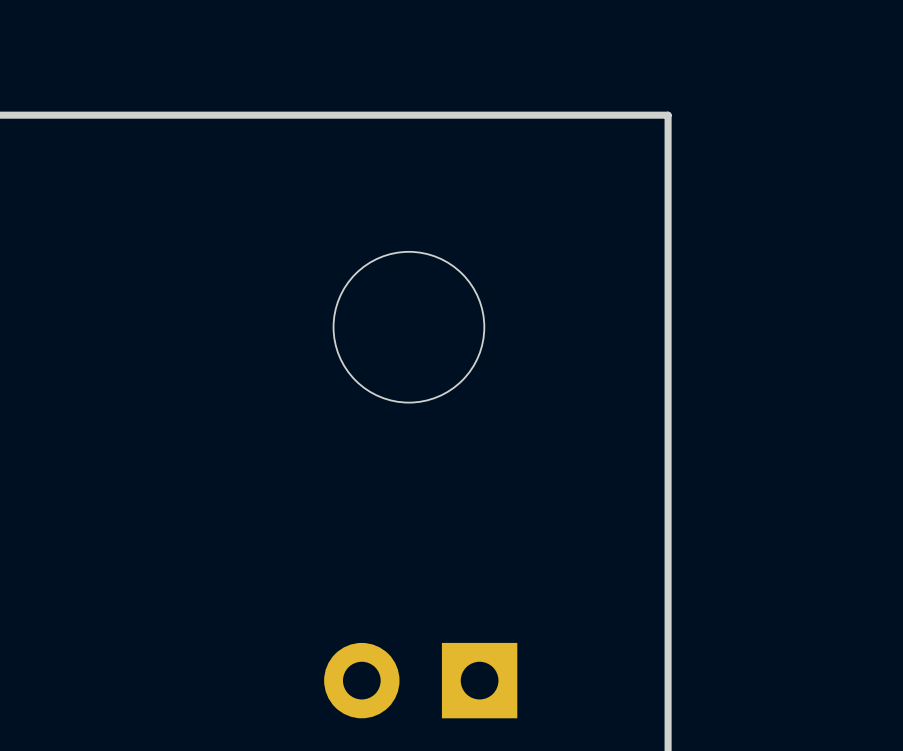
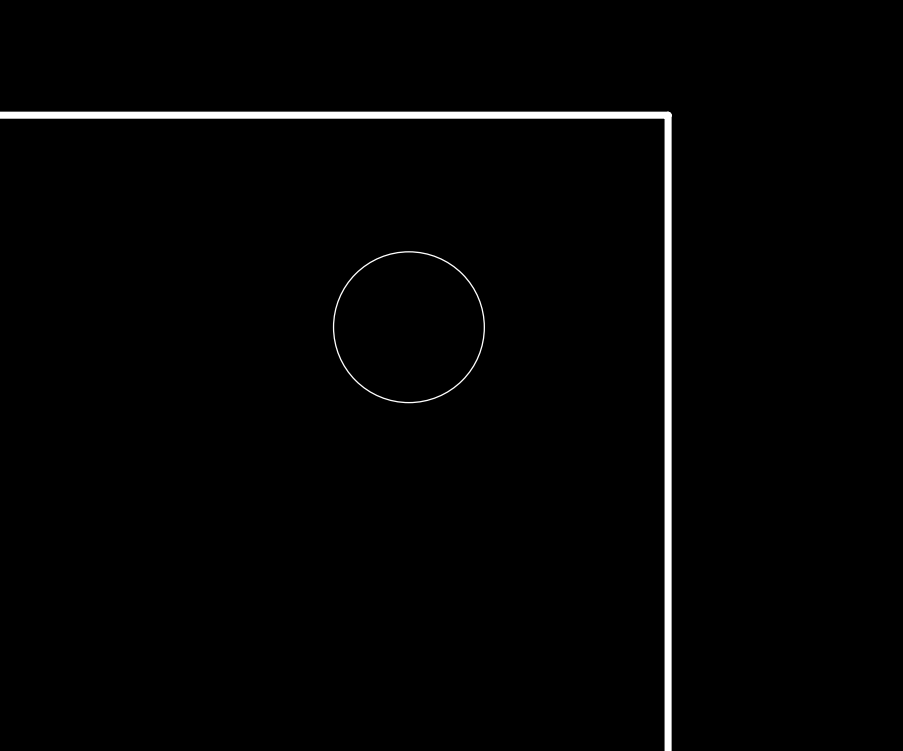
part: (420, 680) -> none

